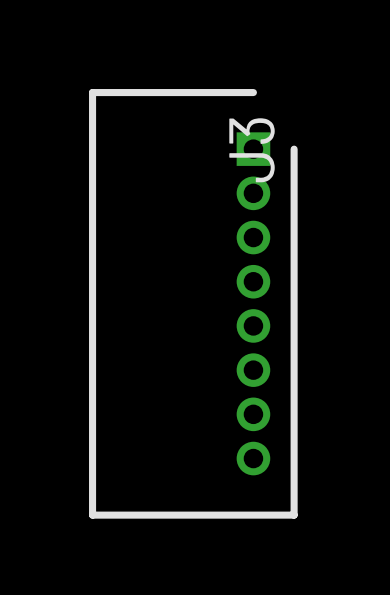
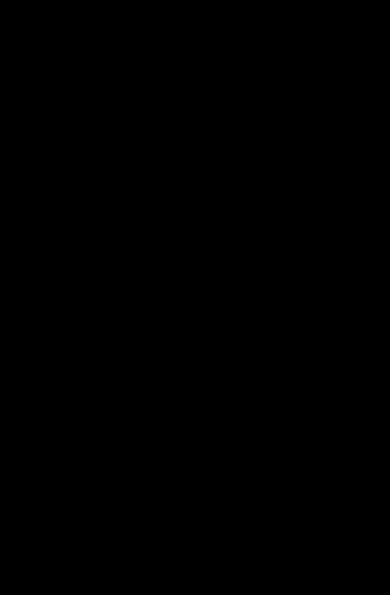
J3: (193, 303) -> none

